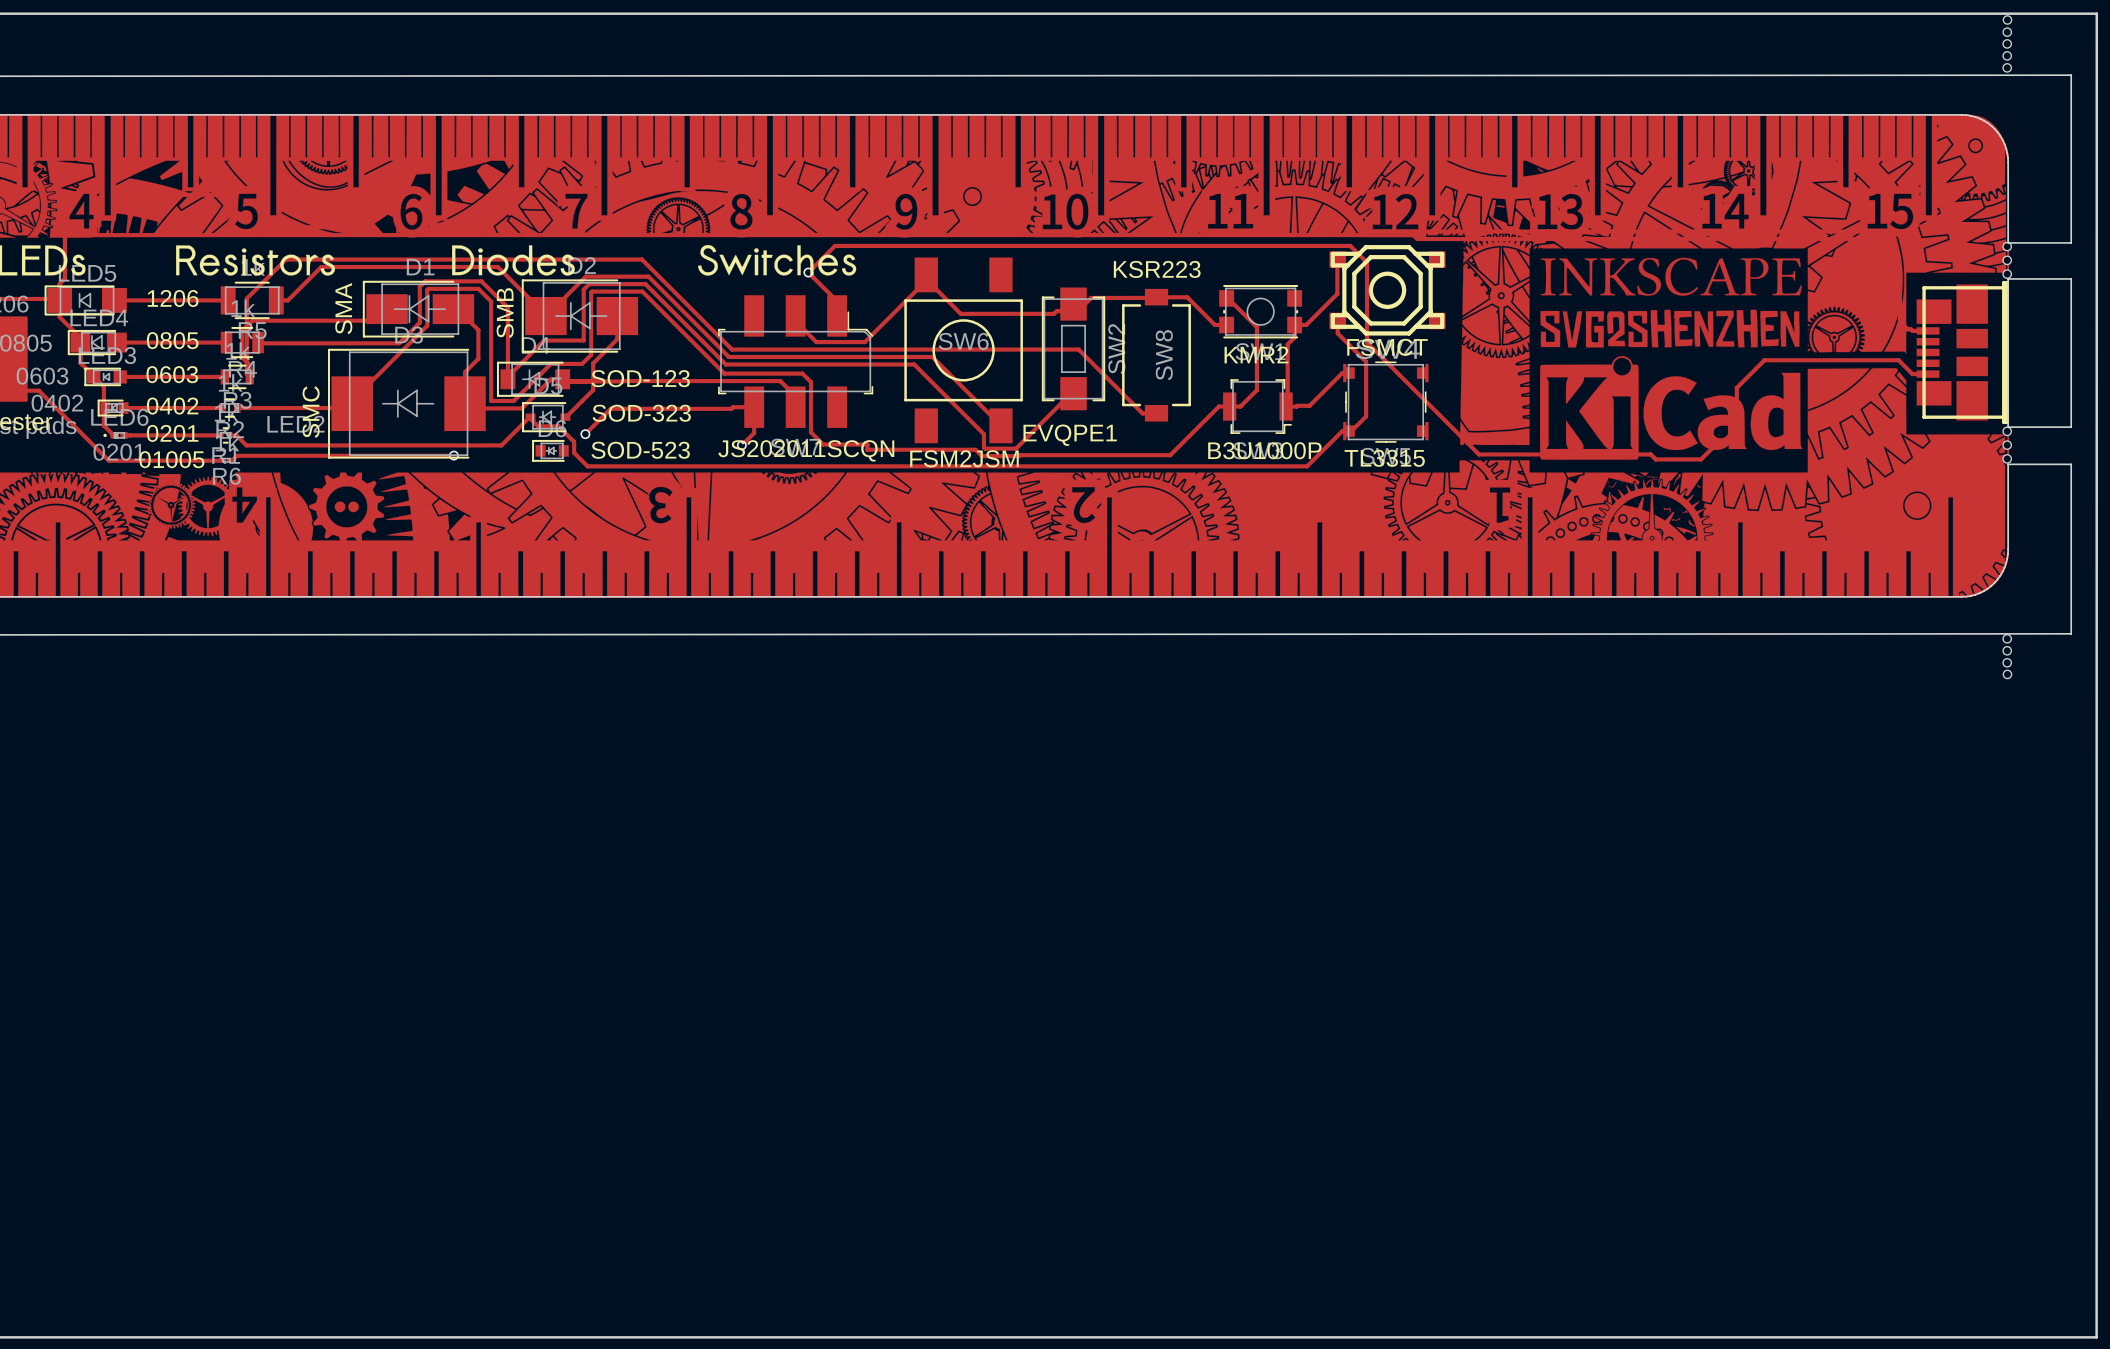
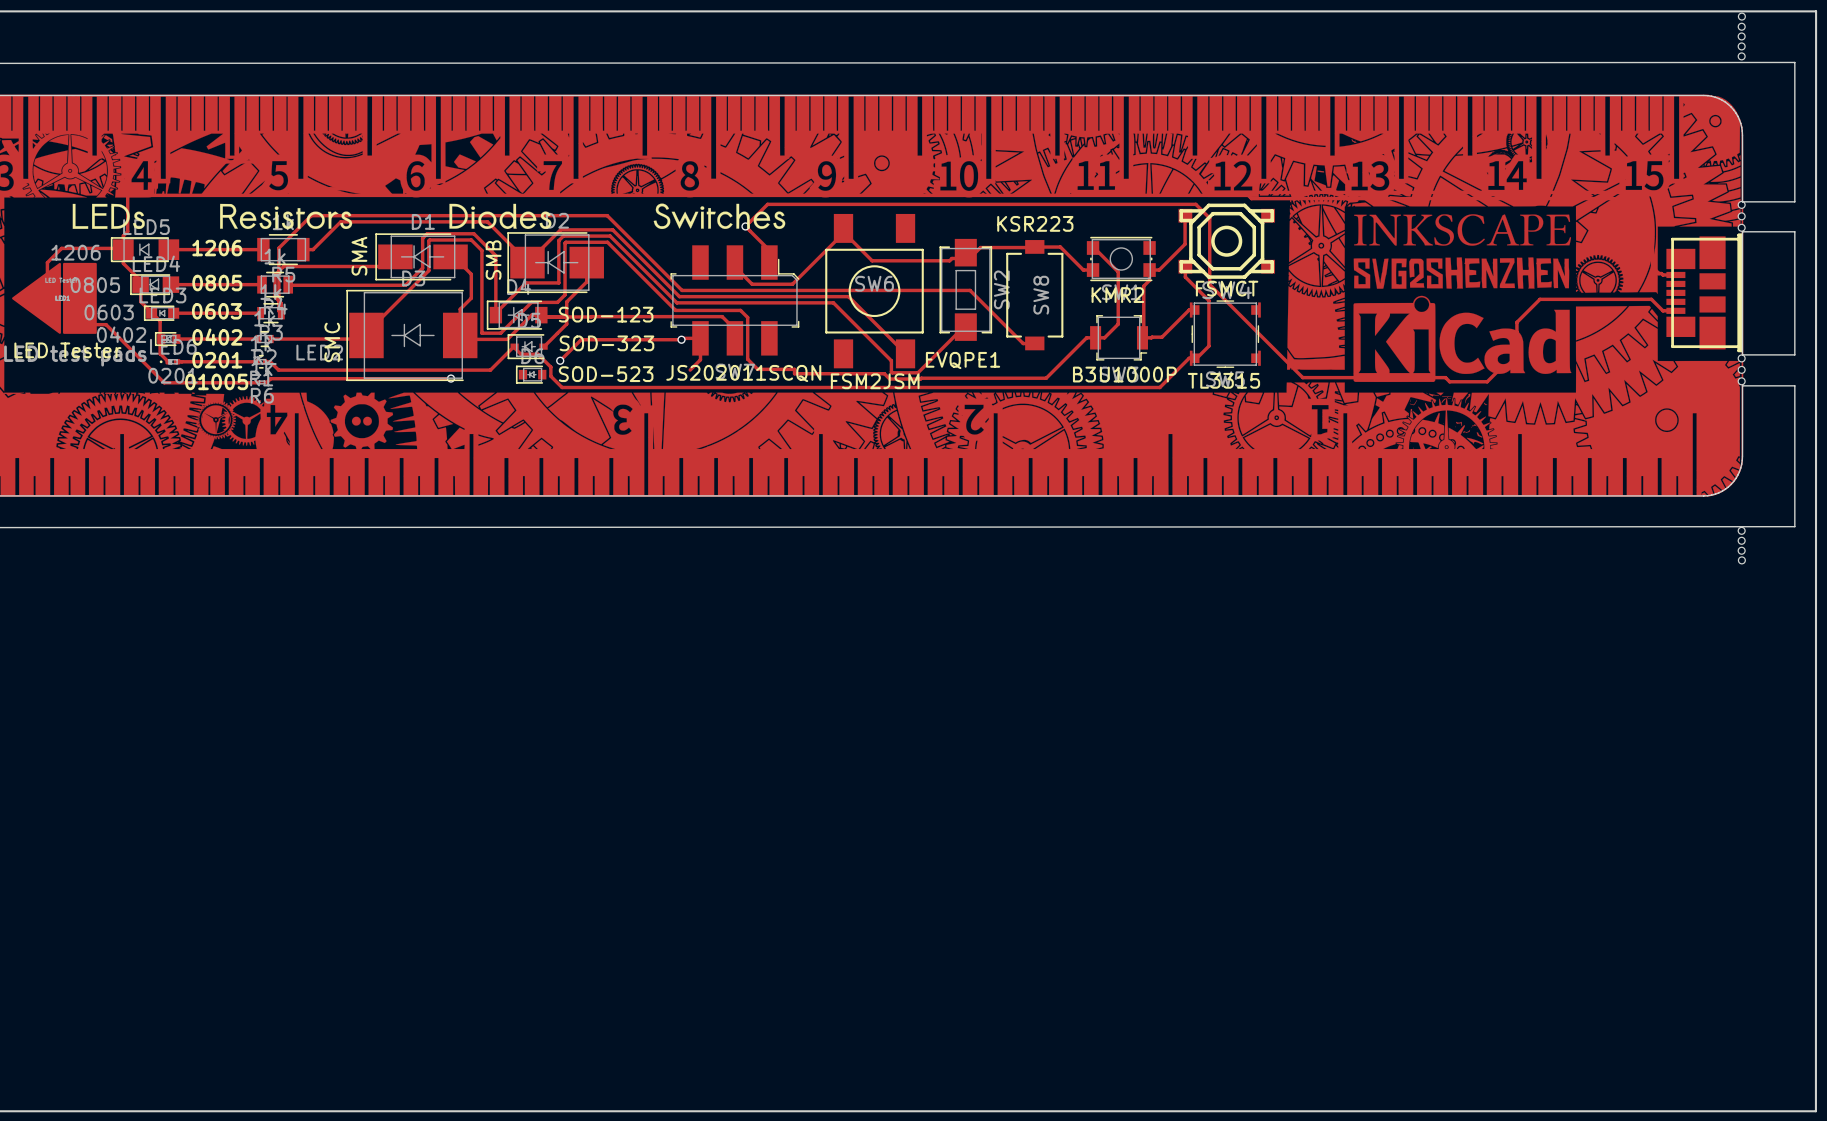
via position: (741, 445) -> (681, 339)

